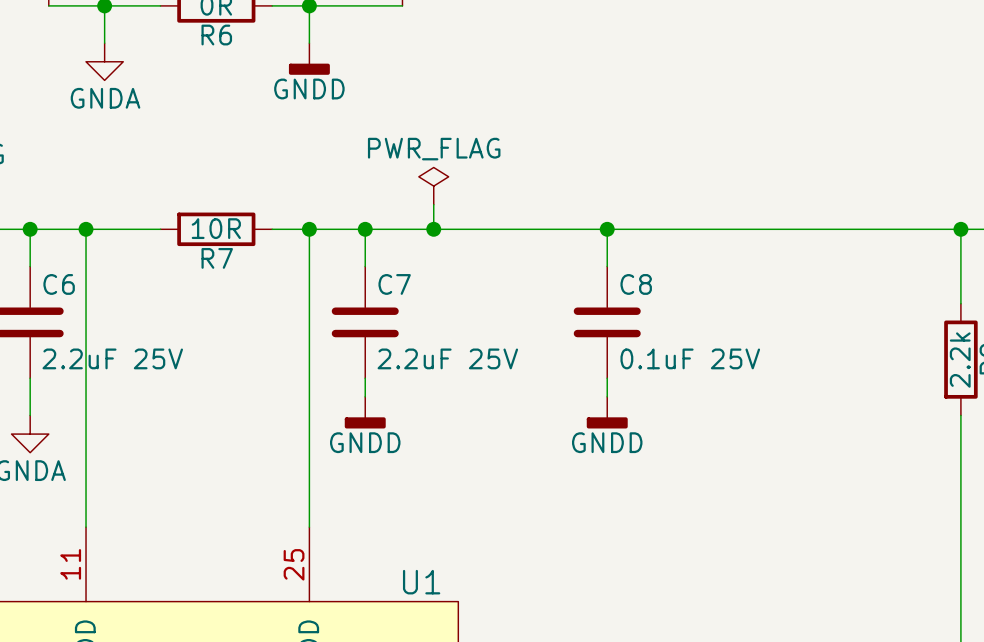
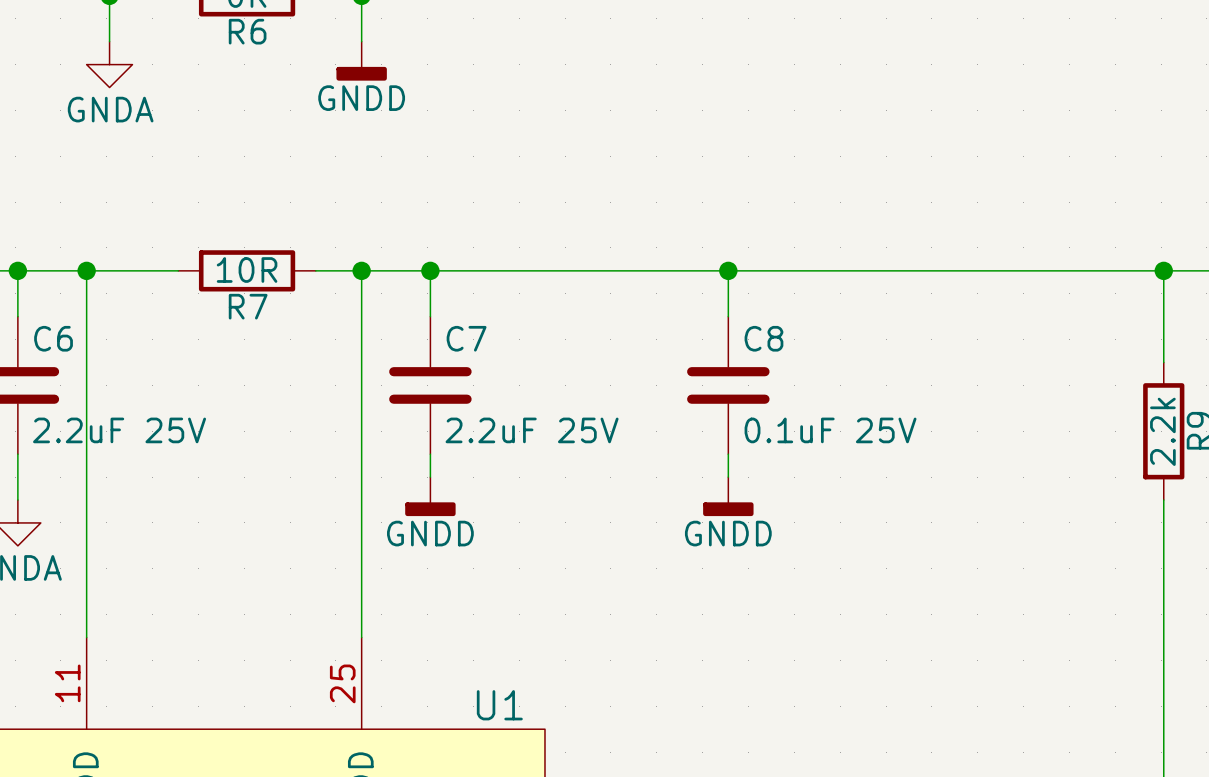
power symbol: PWR_FLAG (433, 186) -> none
wire: (433, 204) (433, 229) -> none
junction: (433, 229) -> none

